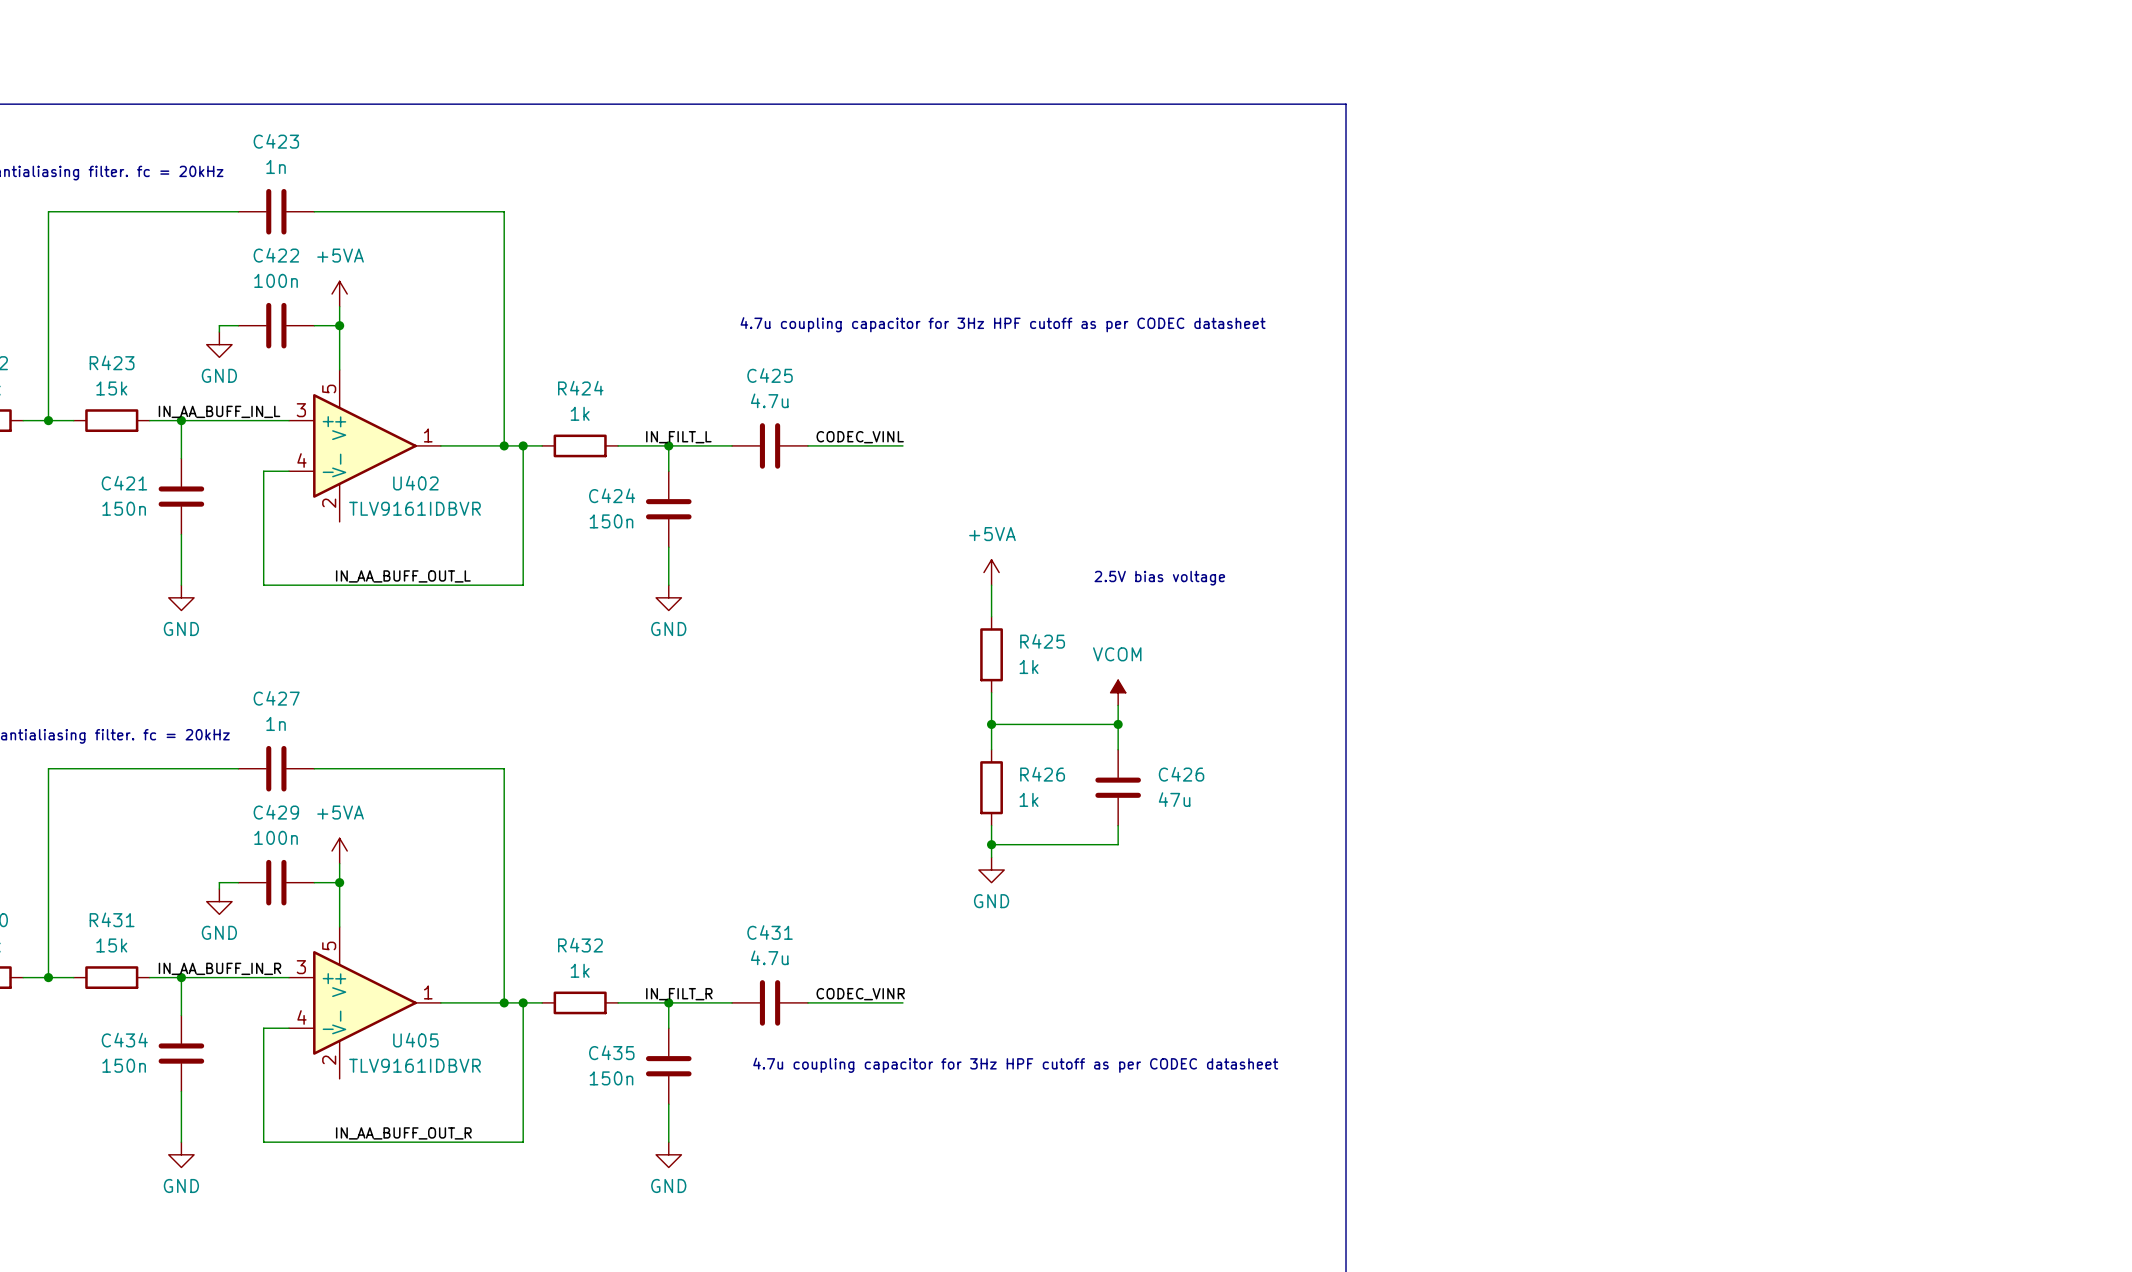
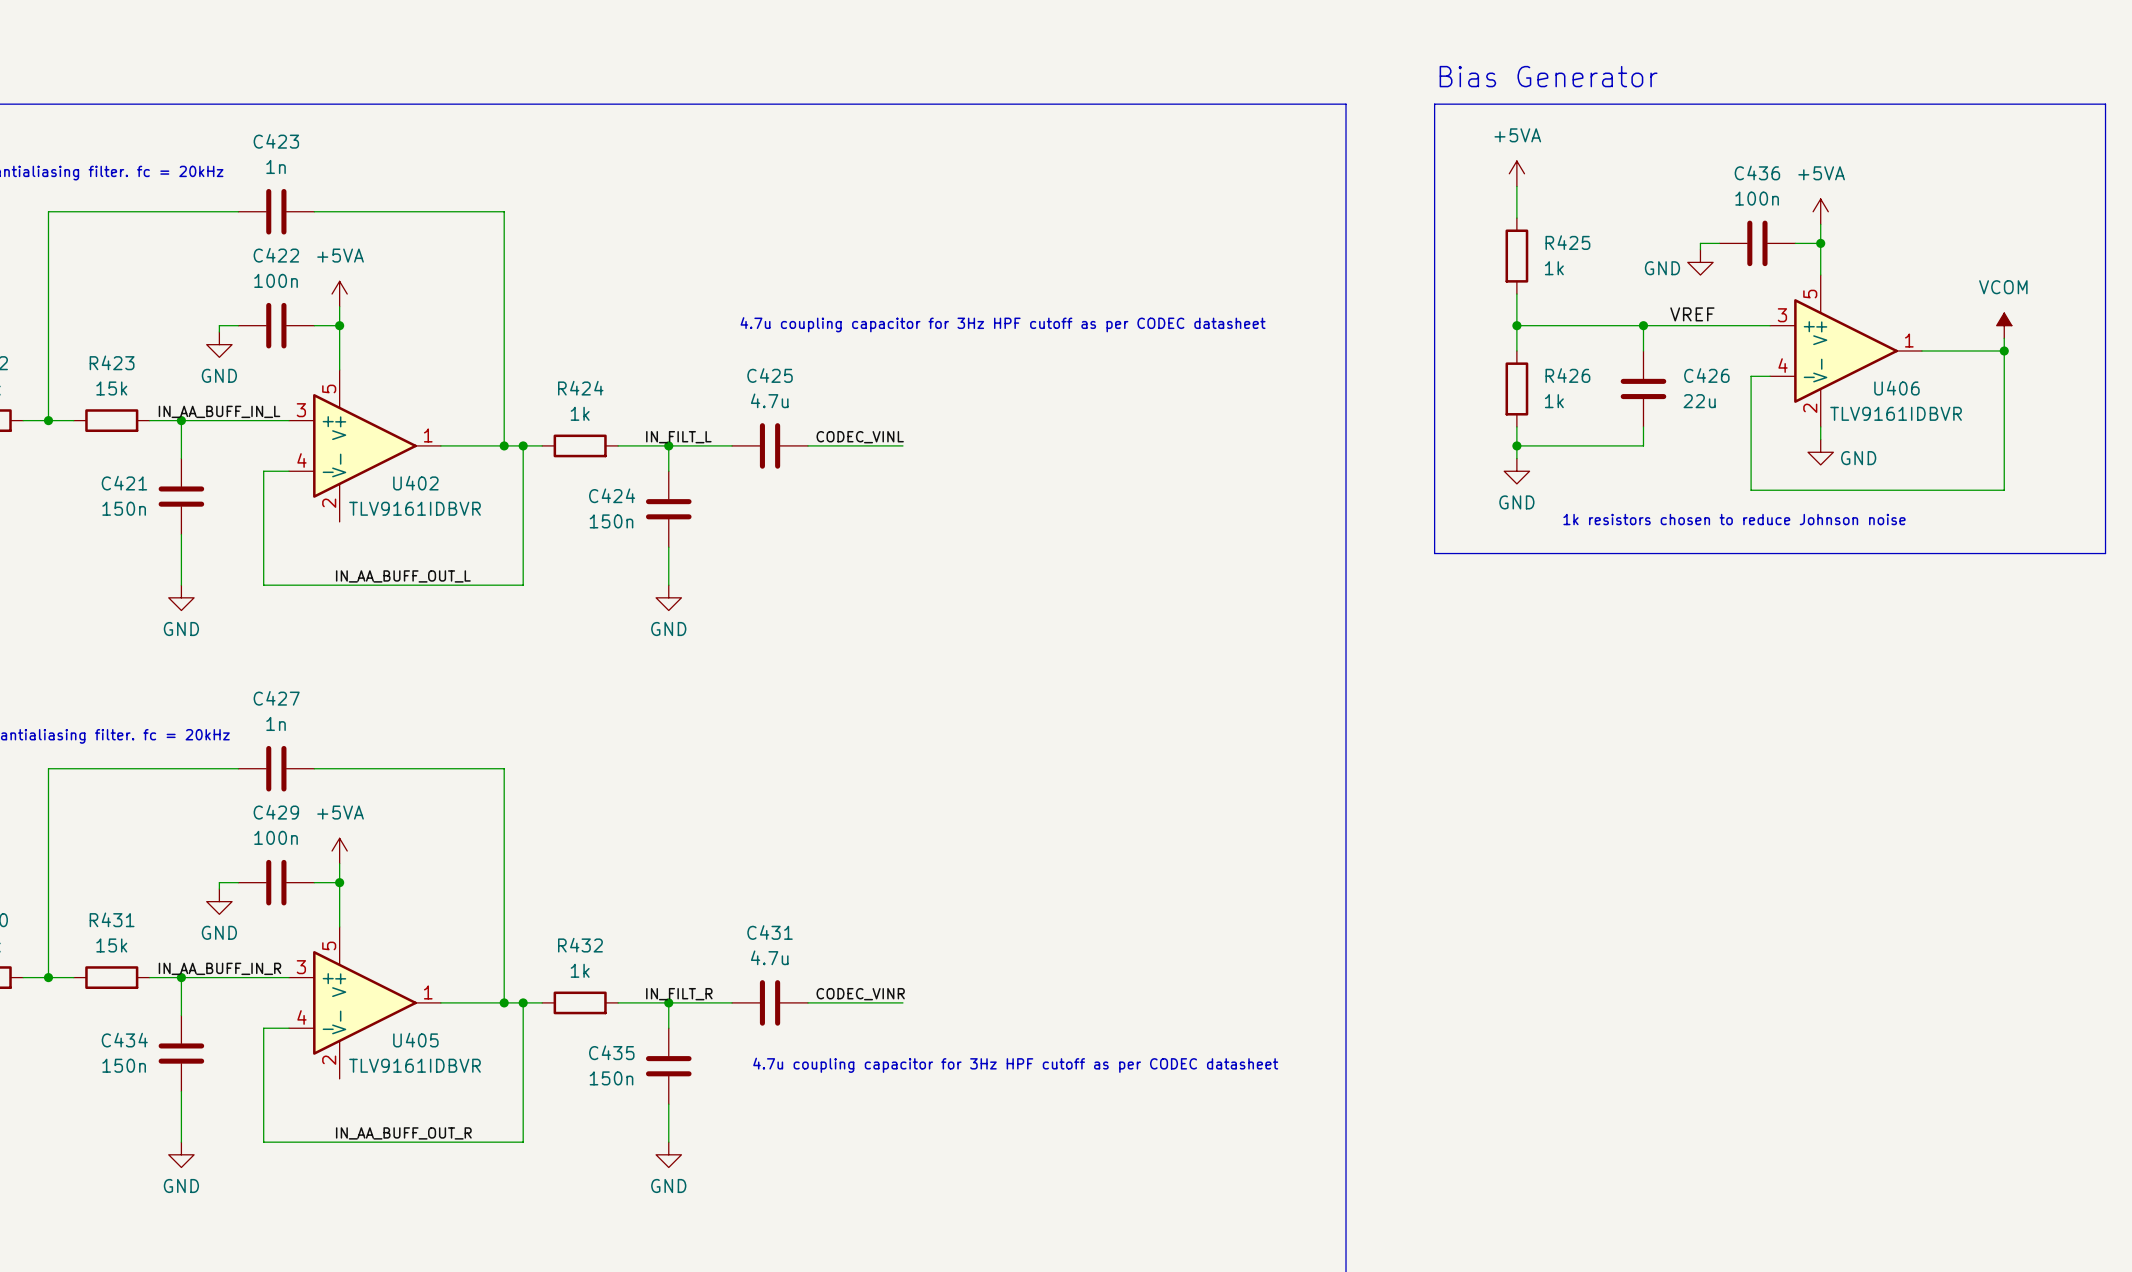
text: none -> Bias Generator (1548, 76)
line: none -> (1434, 104) (2105, 104) (2105, 553) (1434, 553) (1434, 104)
power symbol: none -> +5VA (1516, 173)
wire: none -> (1516, 186) (1516, 218)
power symbol: none -> +5VA (1820, 211)
wire: none -> (1820, 224) (1820, 275)
wire: none -> (1719, 243) (1700, 243) (1700, 249)
C436: none -> 100n (1757, 243)
wire: none -> (1795, 243) (1820, 243)
junction: none -> (1820, 243)
power symbol: none -> GND (1700, 262)
wire: none -> (1516, 294) (1516, 350)
label: none -> VREF (1692, 314)
wire: none -> (1516, 325) (1770, 325)
junction: none -> (1516, 325)
wire: none -> (1643, 325) (1643, 350)
junction: none -> (1643, 325)
power symbol: none -> VCOM (2004, 325)
wire: none -> (2004, 338) (2004, 490) (1751, 490) (1751, 376) (1770, 376)
U406: none -> TLV9161IDBVR (1846, 350)
wire: none -> (1921, 350) (2004, 350)
junction: none -> (2004, 350)
wire: none -> (1516, 426) (1516, 458)
wire: none -> (1643, 426) (1643, 445) (1516, 445)
wire: none -> (1820, 426) (1820, 439)
junction: none -> (1516, 445)
power symbol: none -> GND (1820, 452)
power symbol: none -> GND (1516, 471)
text: none -> 1k resistors chosen to reduce Johnson noise (1734, 519)
power symbol: +5VA (991, 572) -> none
text: 2.5V bias voltage (1159, 578) -> none
wire: (991, 585) (991, 616) -> none
R425 position: (991, 654) -> (1516, 256)
wire: (991, 692) (991, 749) -> none
power symbol: VCOM (1118, 692) -> none
wire: (1118, 705) (1118, 749) -> none
wire: (991, 724) (1118, 724) -> none
junction: (991, 724) -> none
junction: (1118, 724) -> none
R426 position: (991, 787) -> (1516, 388)
C426 position: (1118, 787) -> (1643, 388)
C426 value: 47u (1174, 799) -> 22u (1699, 401)
wire: (991, 825) (991, 857) -> none
wire: (1118, 825) (1118, 844) (991, 844) -> none
junction: (991, 844) -> none
power symbol: GND (991, 870) -> none

